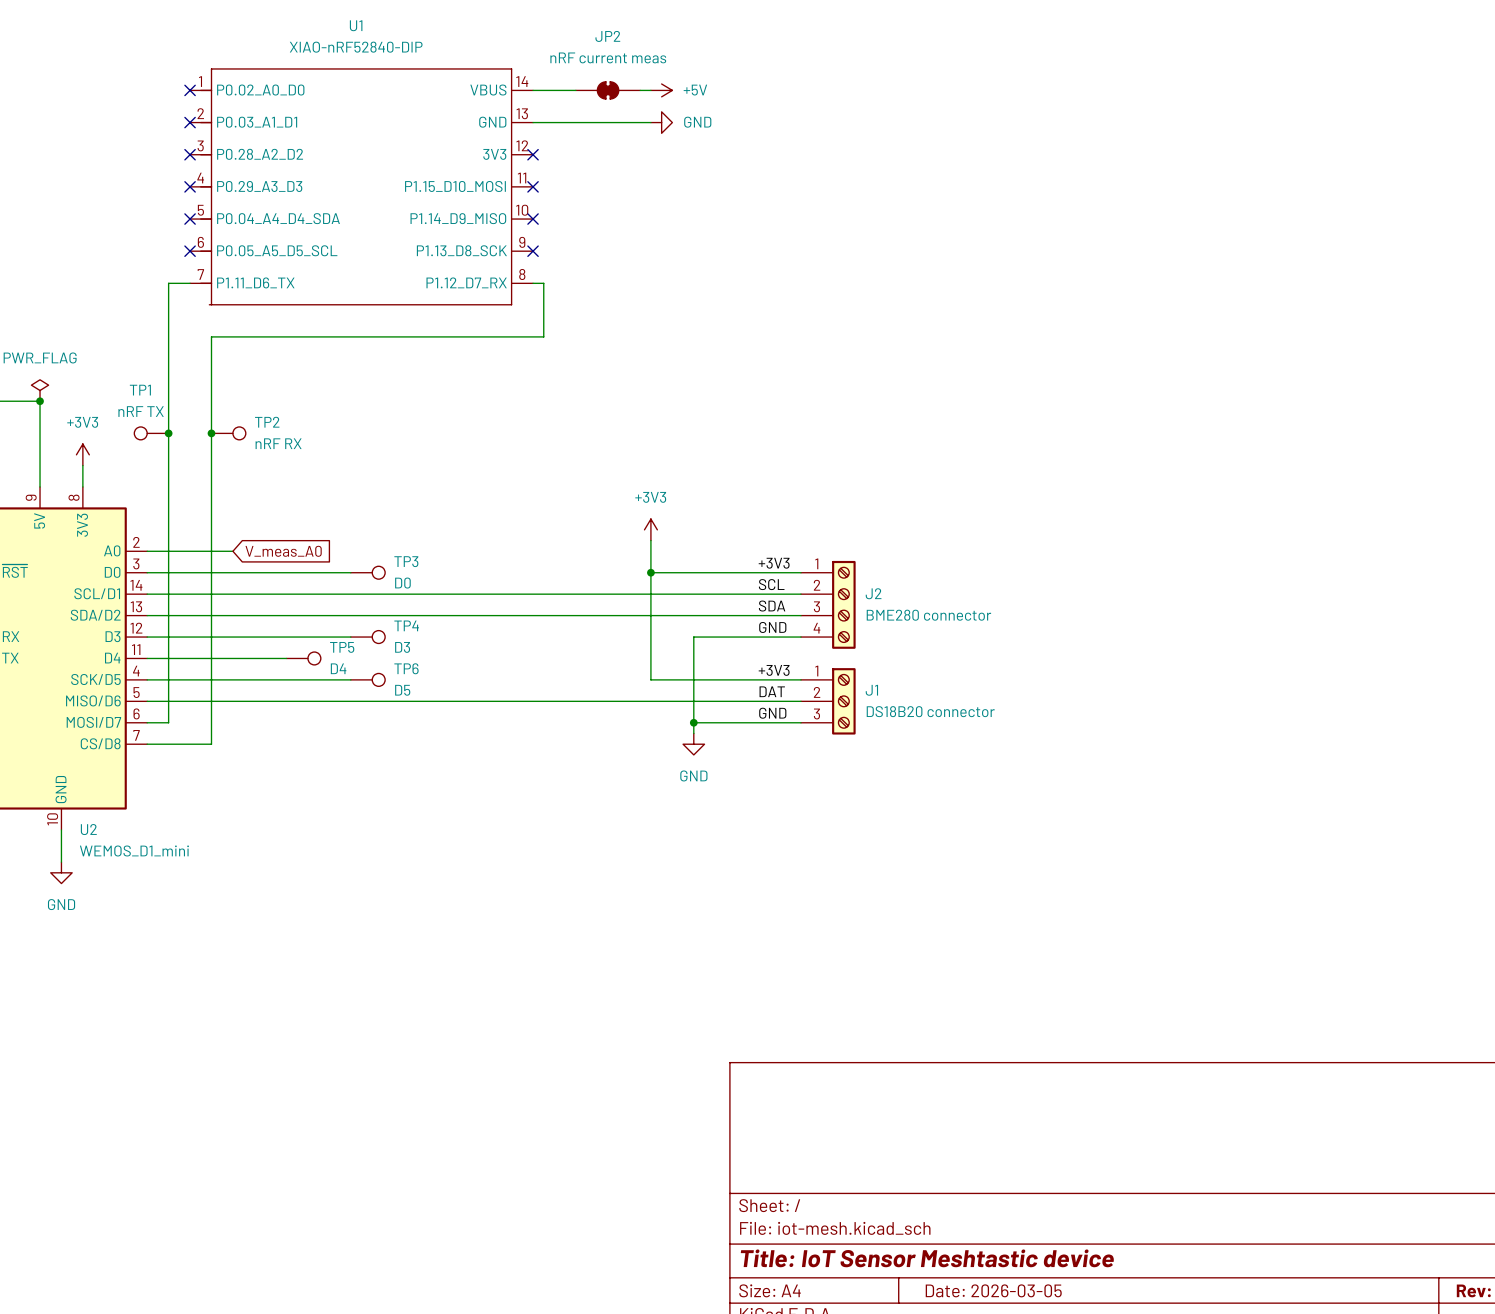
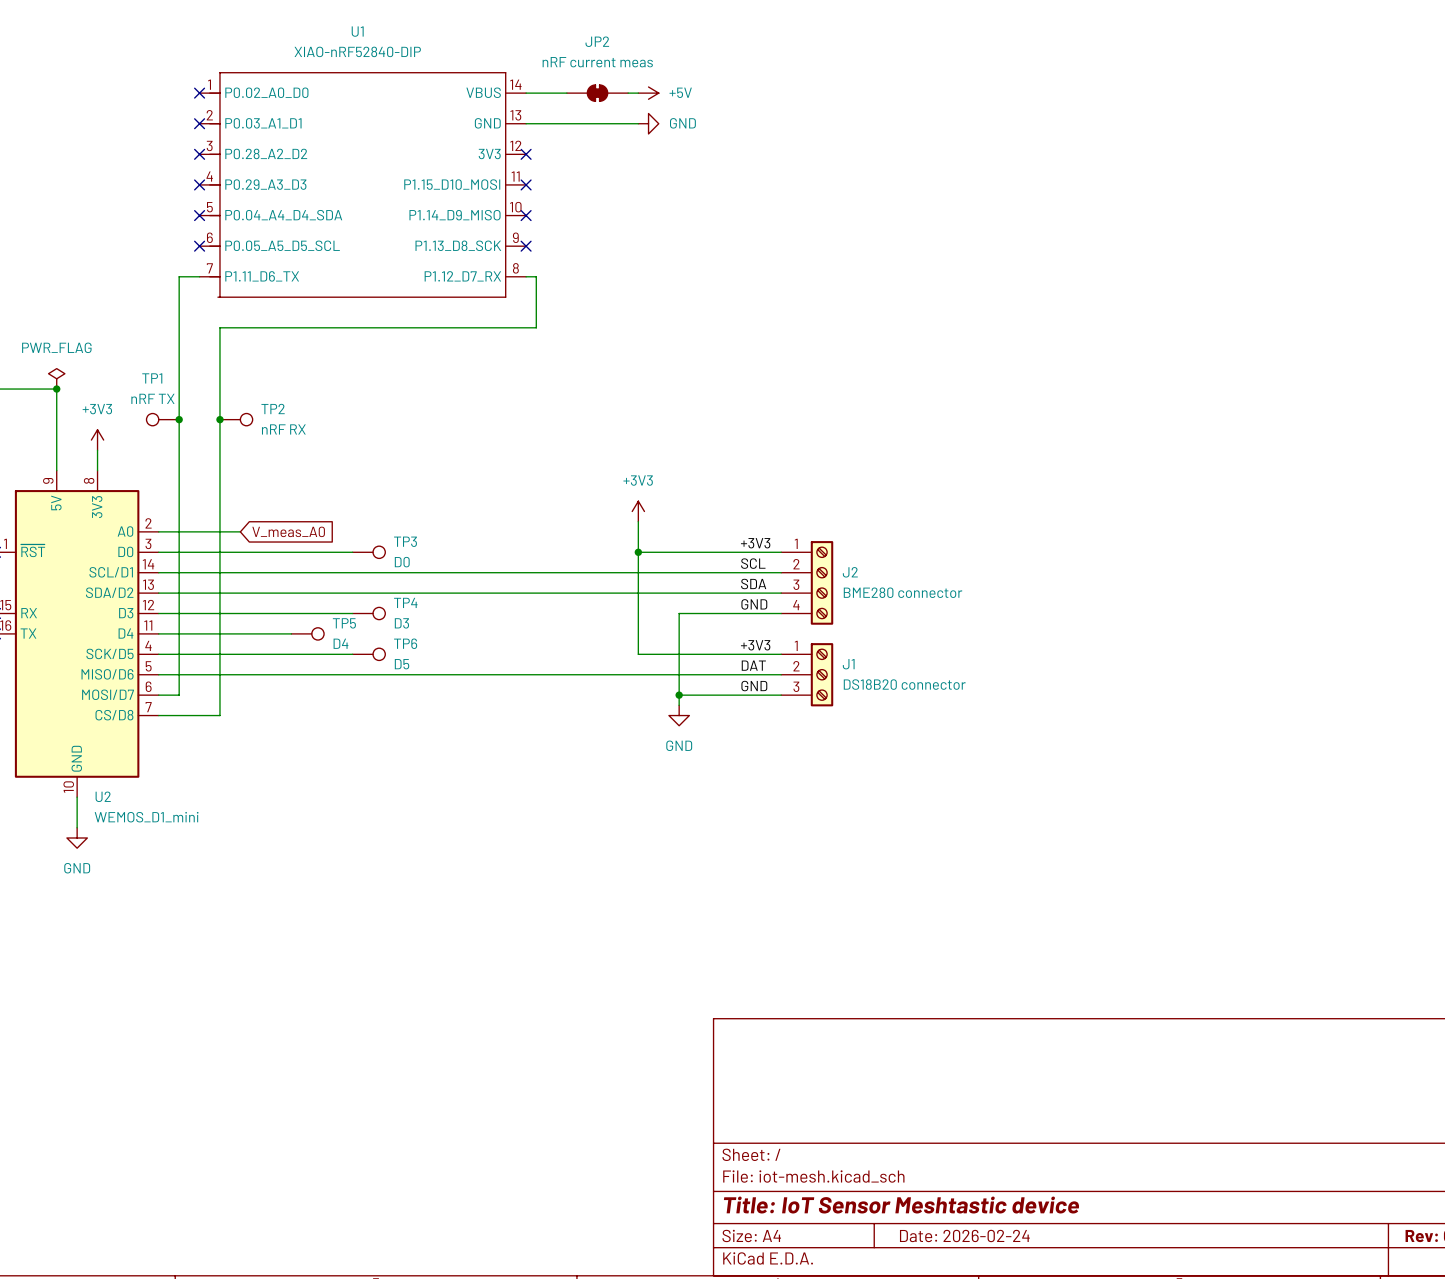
title block: Date: 2026-03-05 (993, 1290) -> Date: 2026-02-24 (964, 1235)

